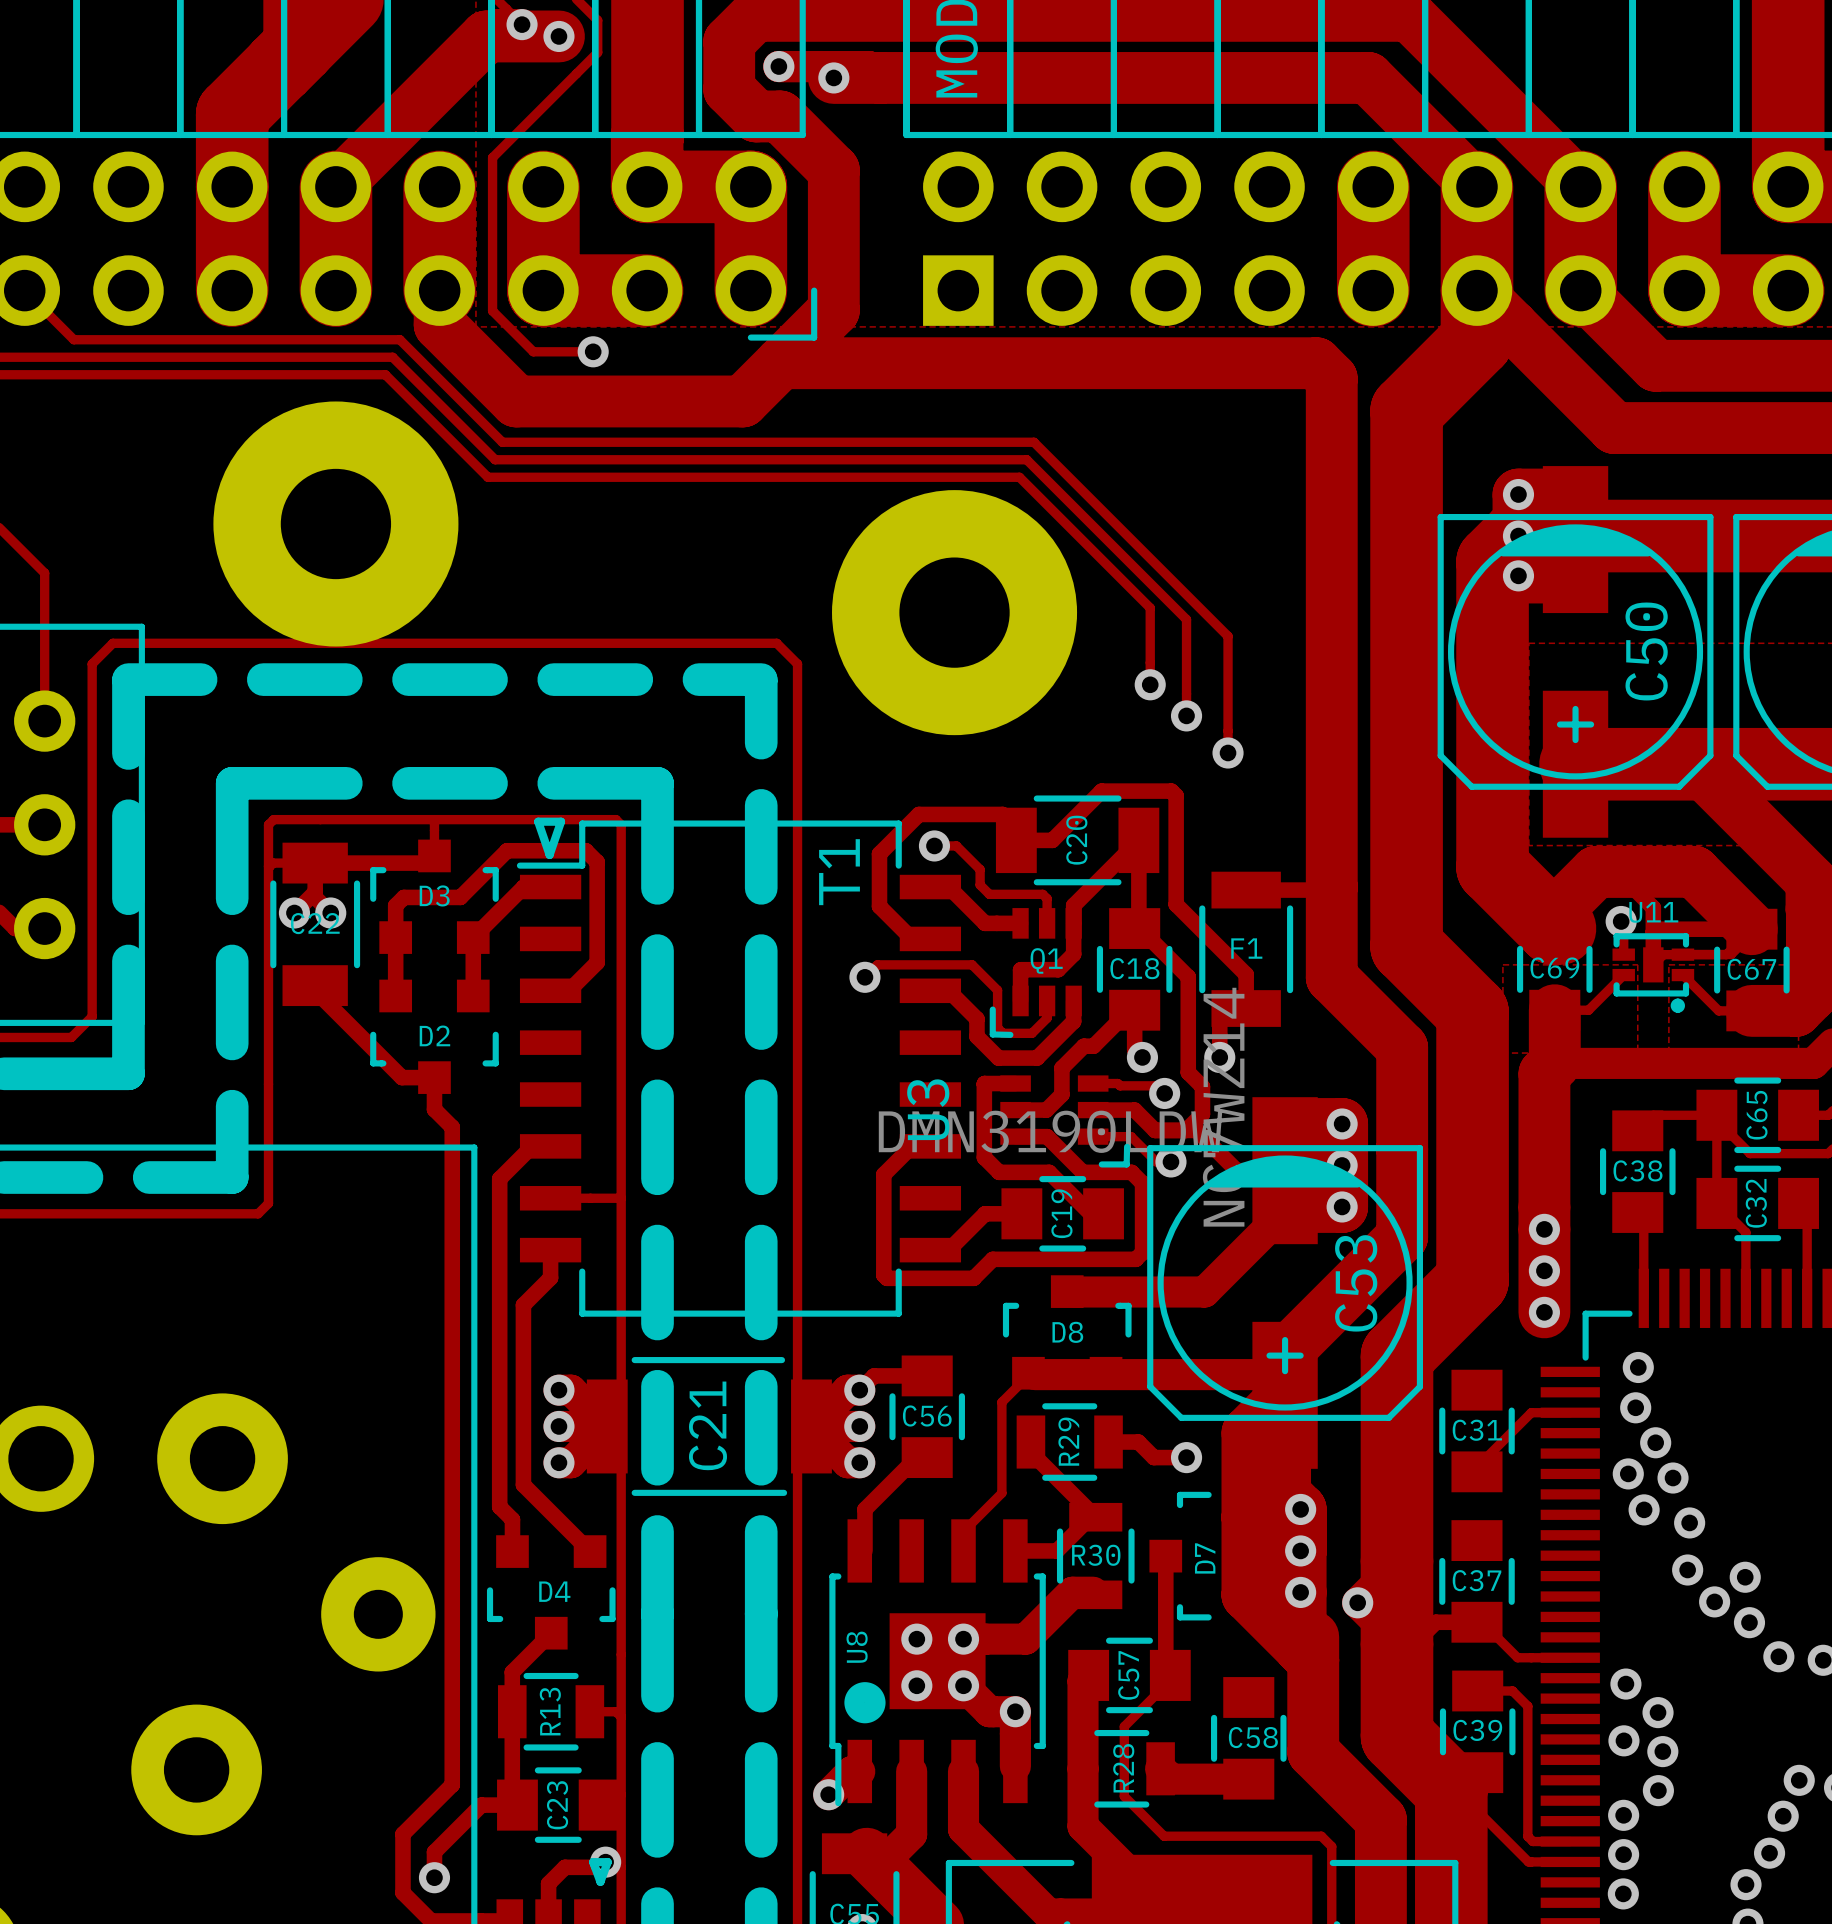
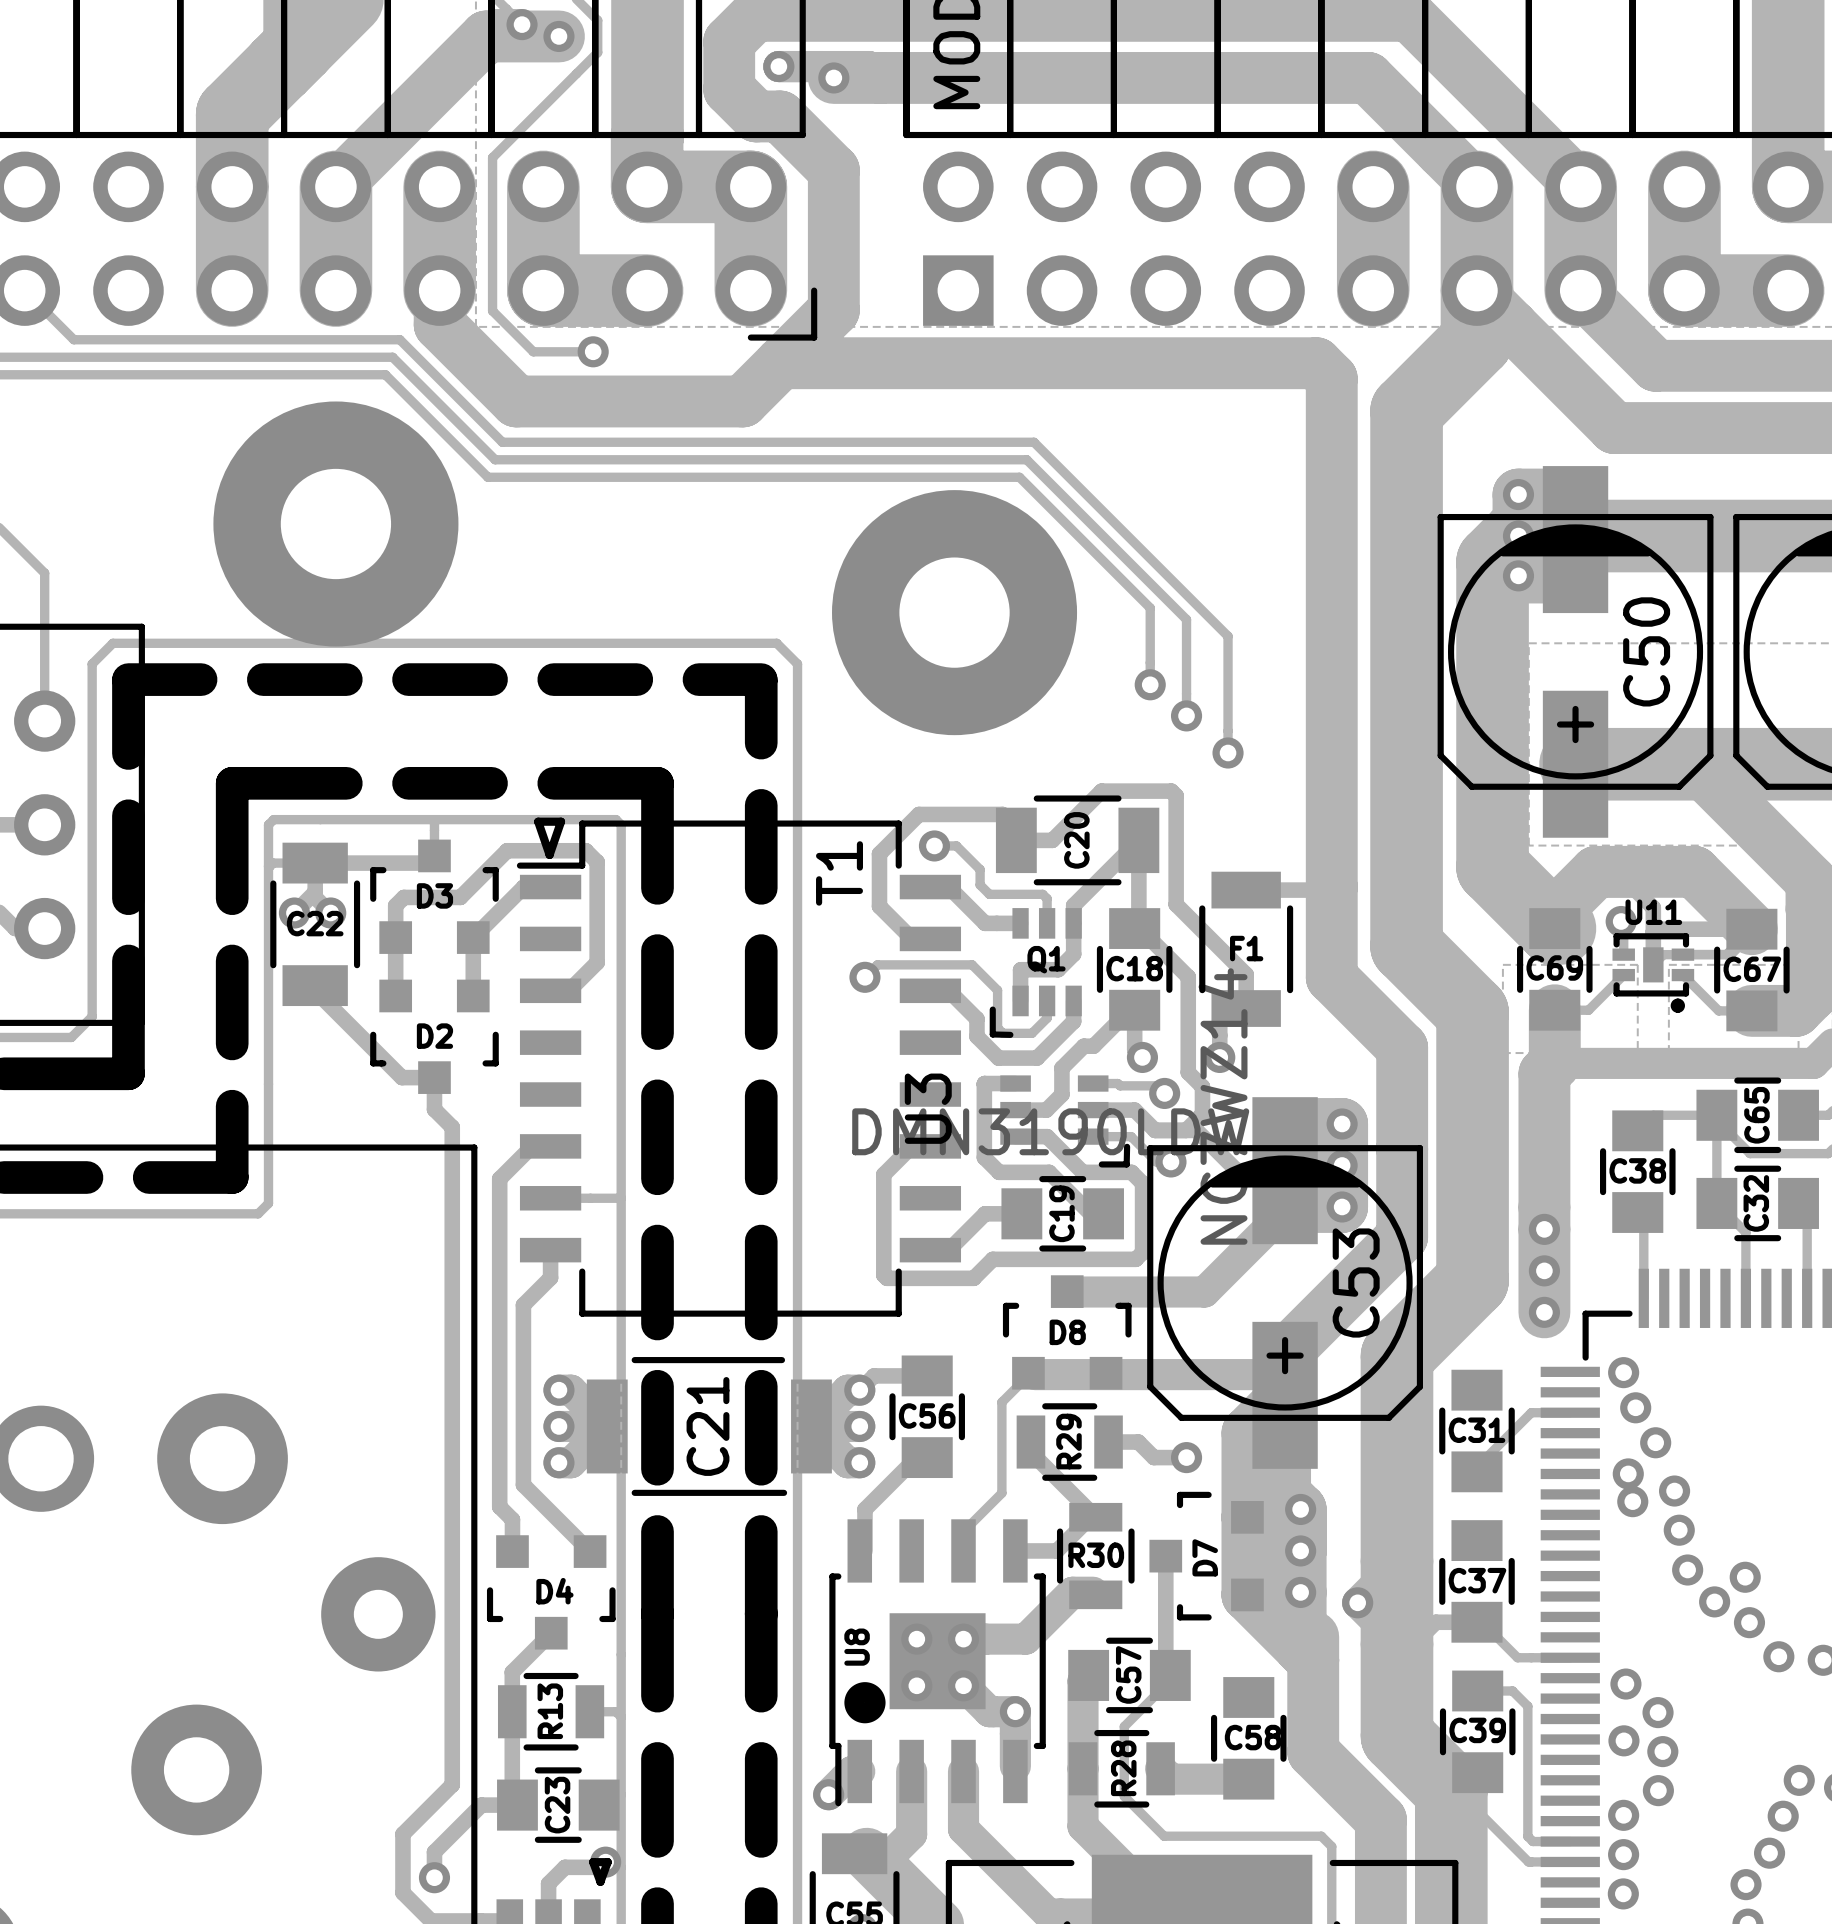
via position: (1638, 1367) -> (1623, 1372)
via position: (1673, 1478) -> (1674, 1491)
via position: (1644, 1509) -> (1632, 1501)
via position: (1689, 1522) -> (1679, 1530)

